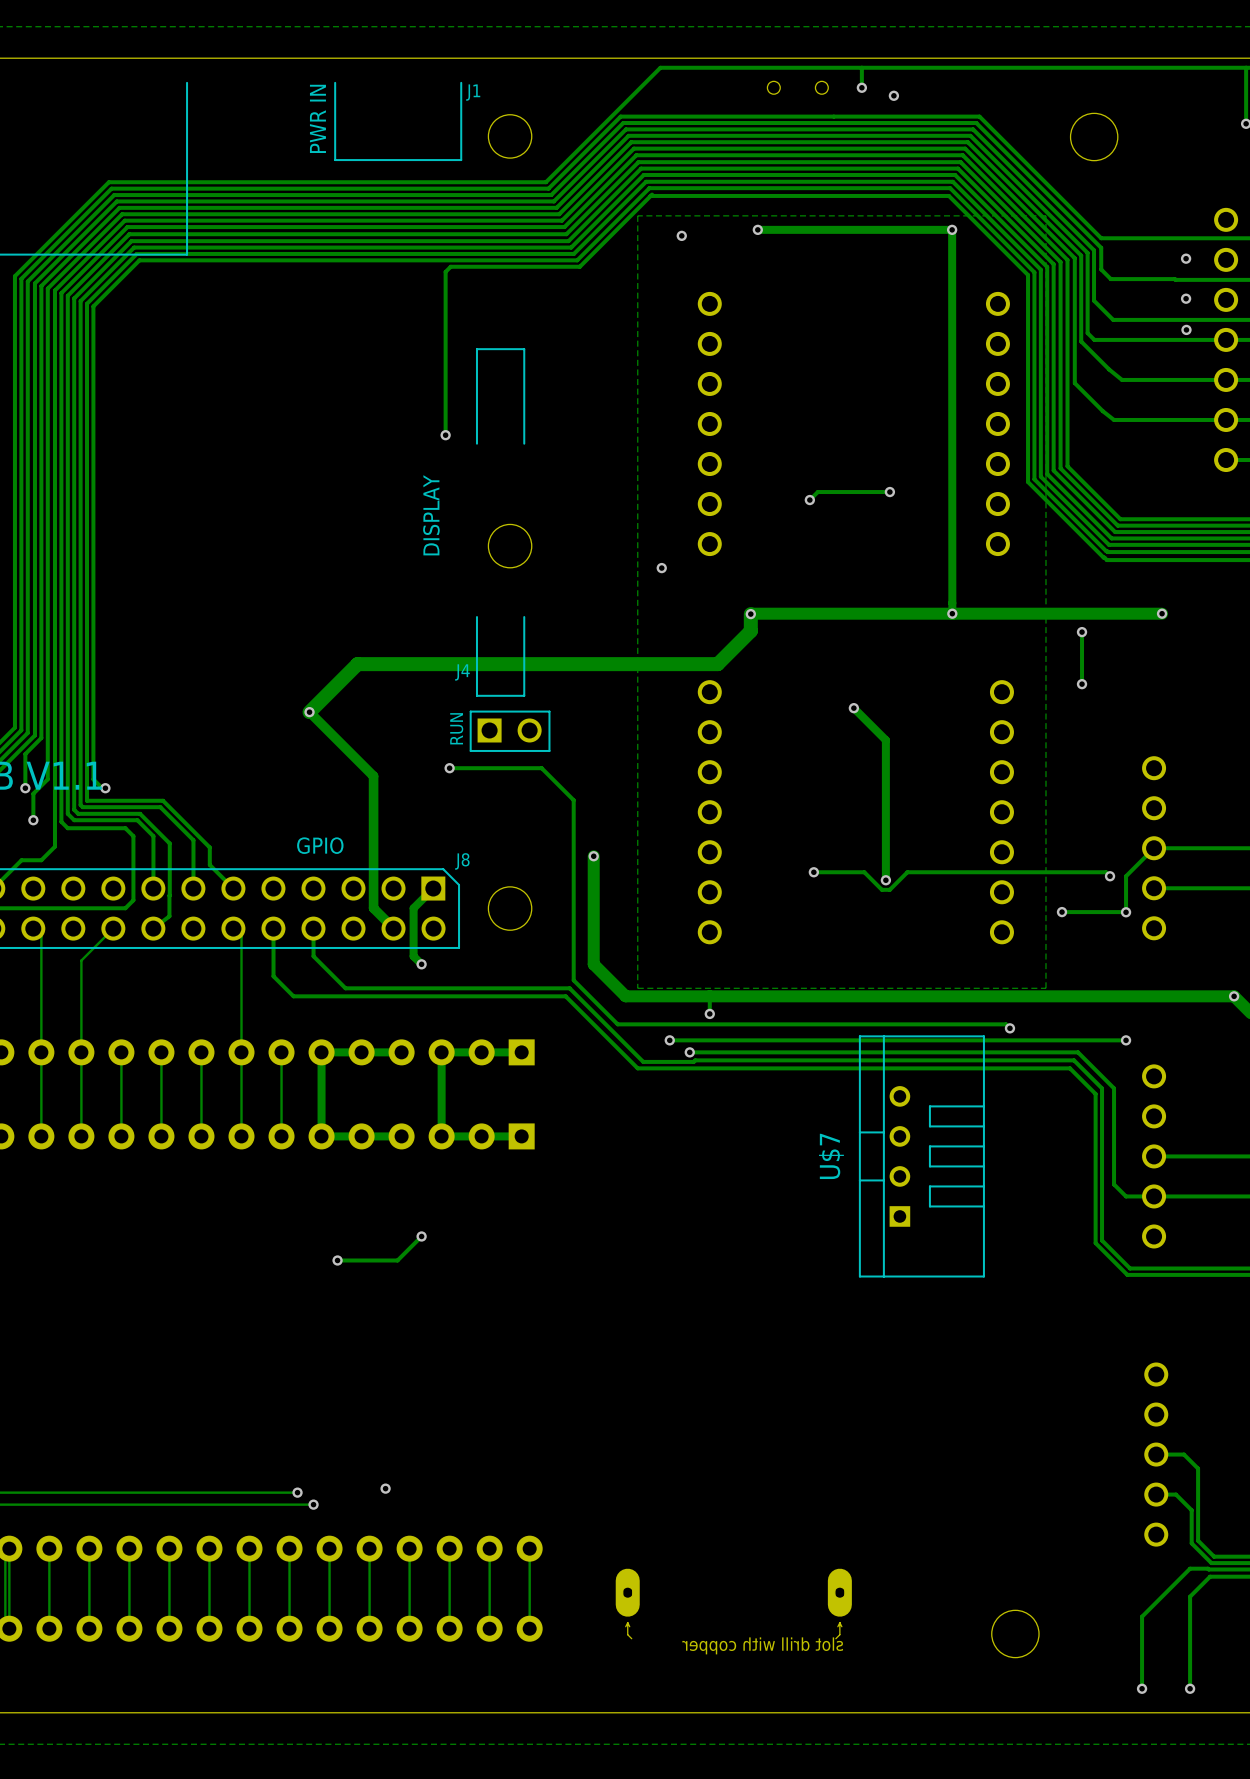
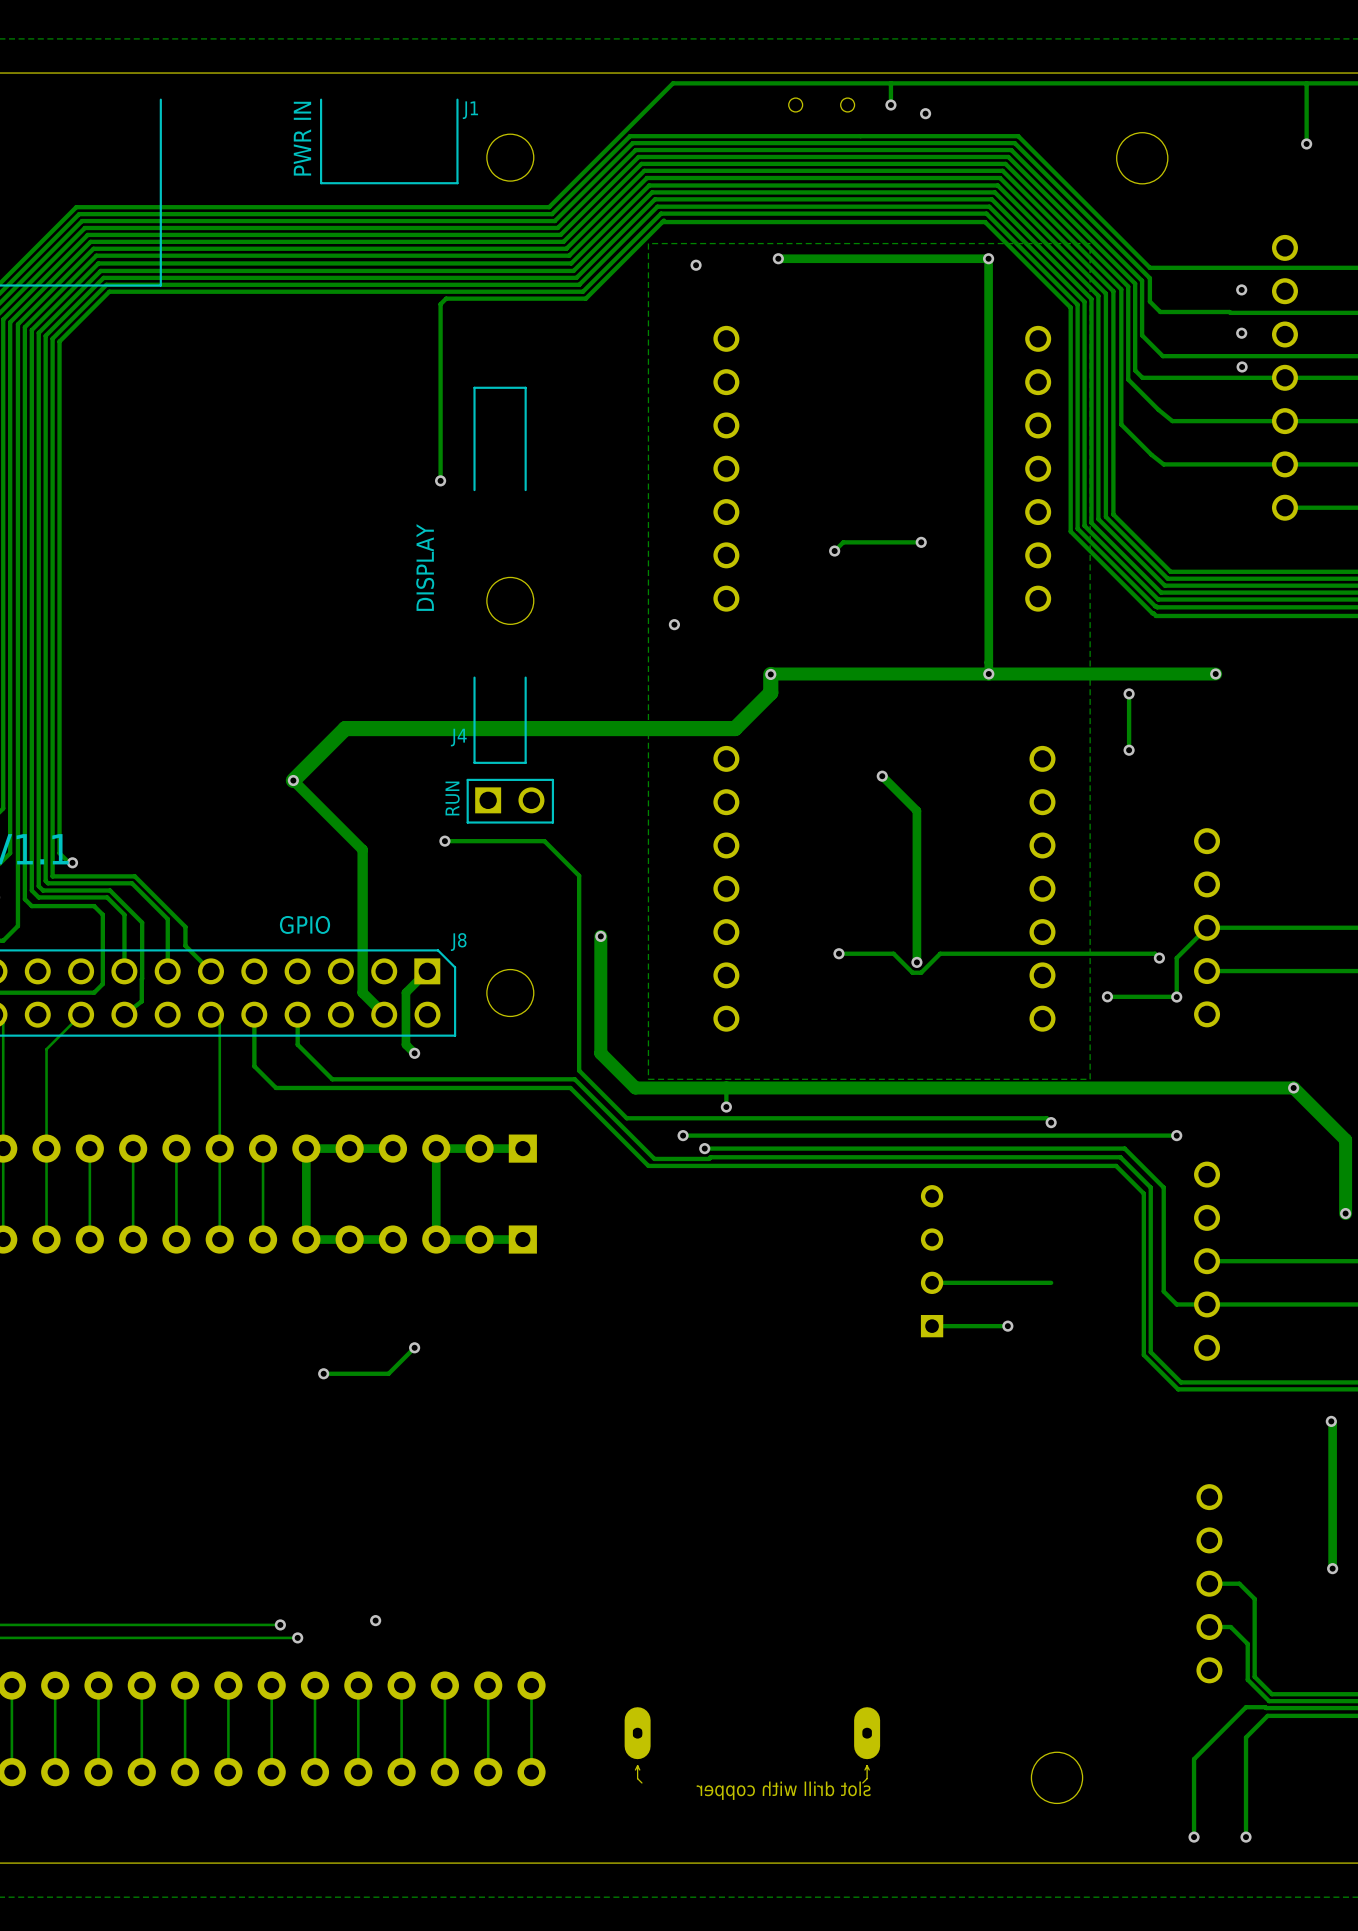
U$7 side: bottom (921, 1156) -> top (932, 1261)
track: none -> (1051, 1282) (932, 1282)
track: none -> (1007, 1326) (932, 1326)
via: none -> (1007, 1326)

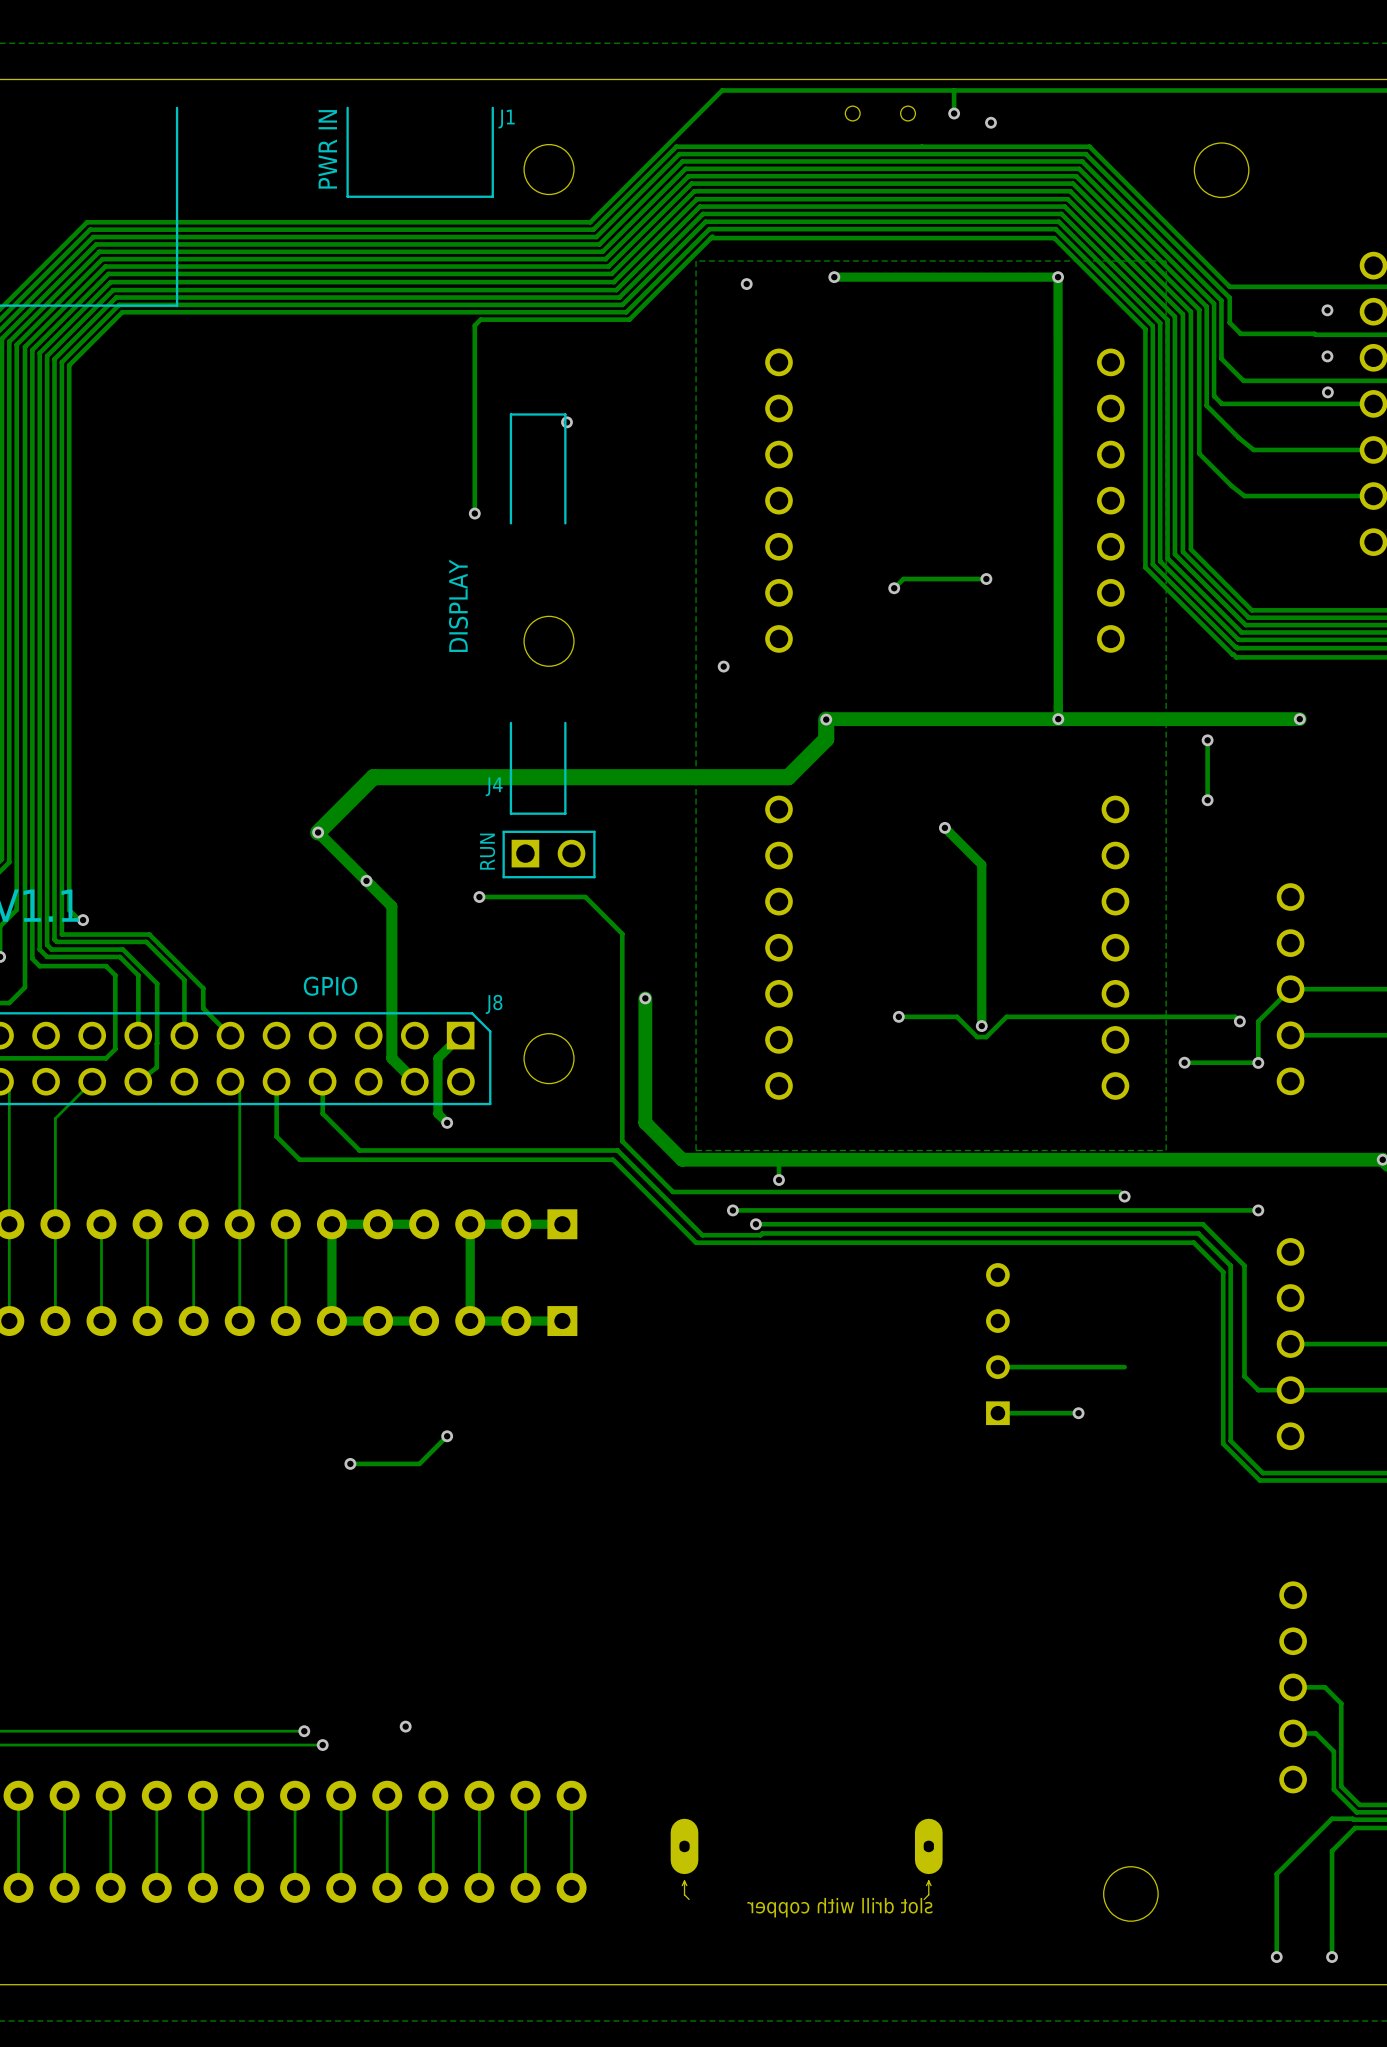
via: none -> (566, 422)
via: none -> (366, 880)

